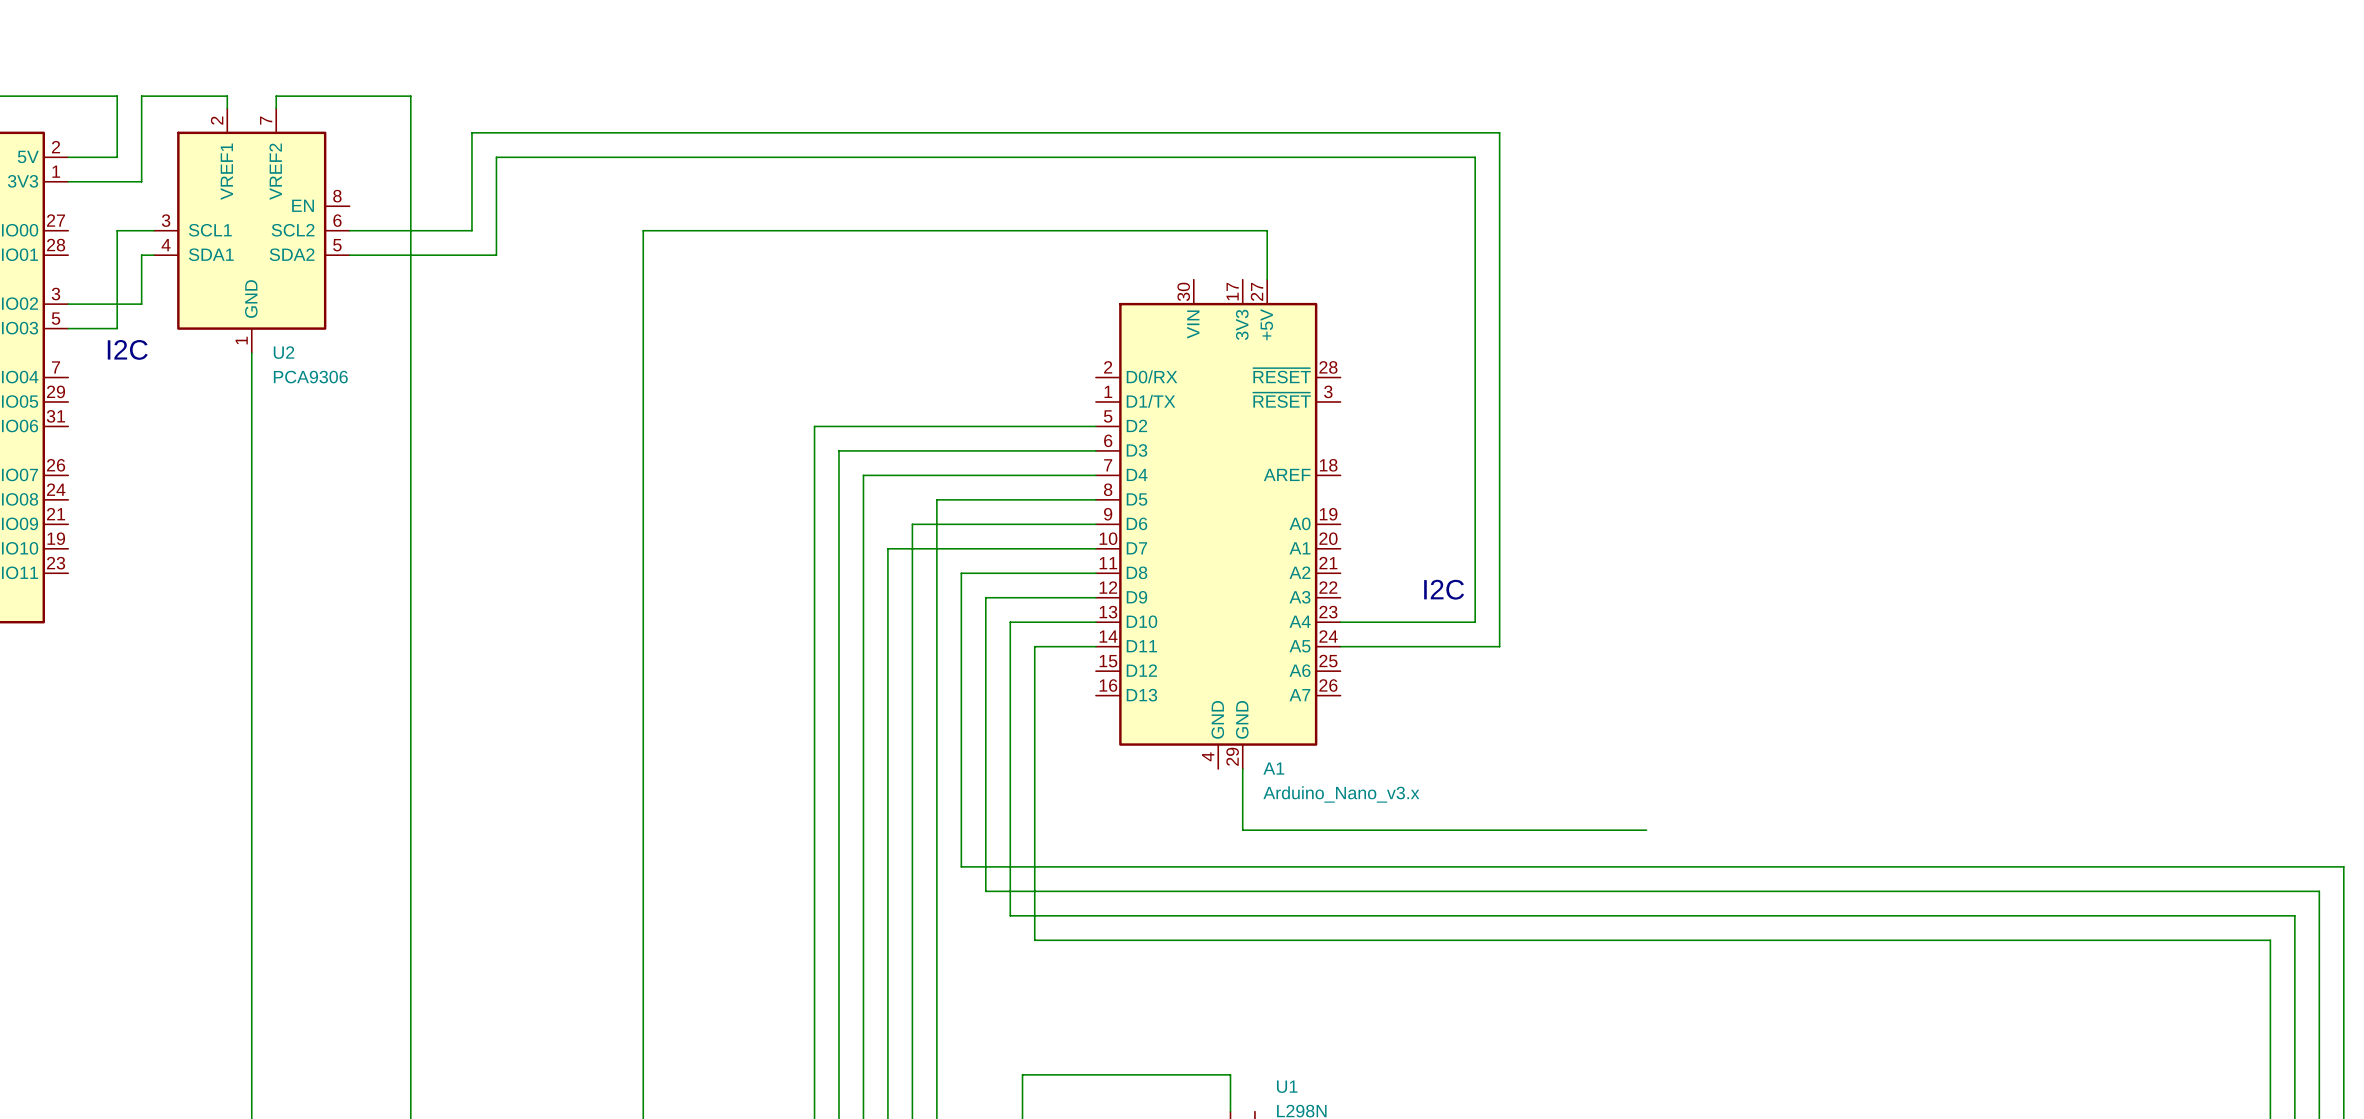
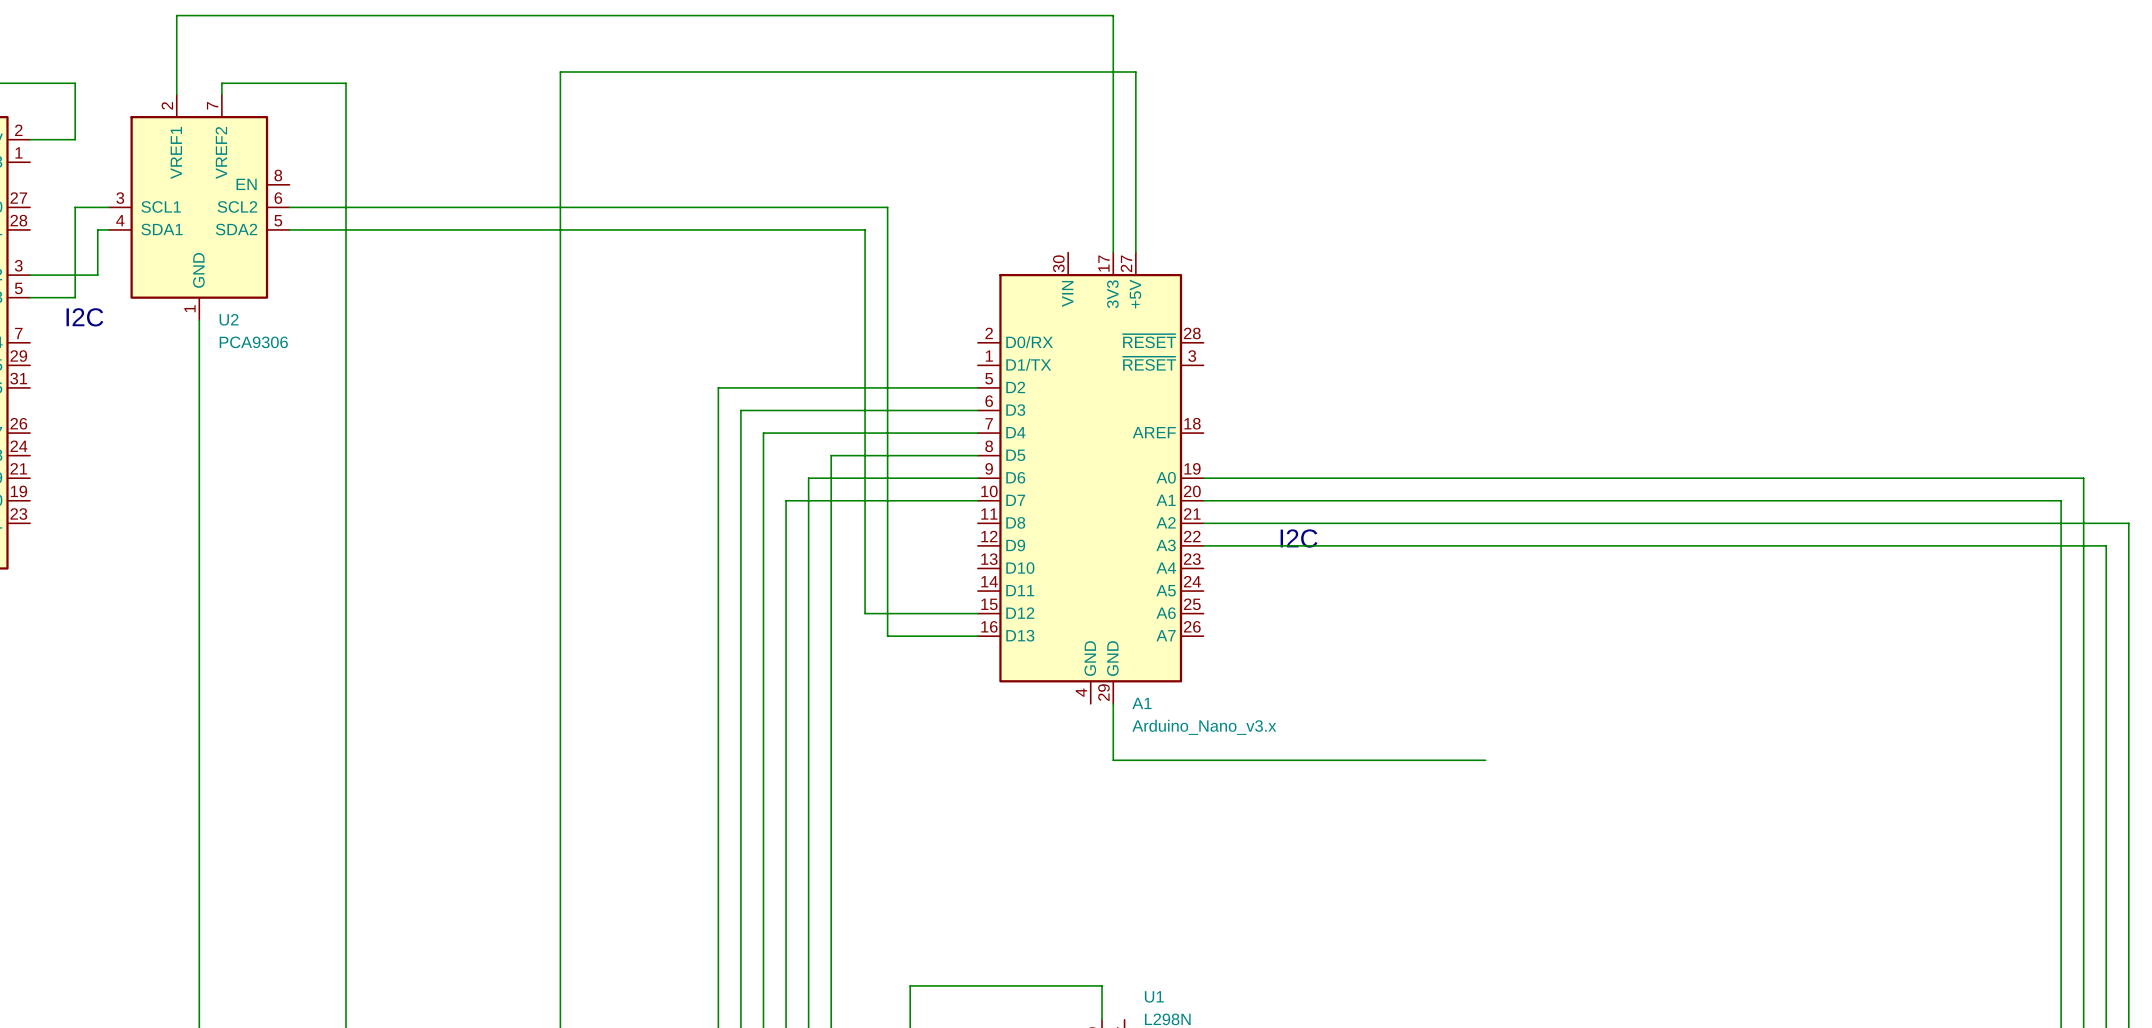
wire: (227, 96) (141, 96) (141, 181) (68, 181) -> (176, 83) (176, 15) (1113, 15) (1113, 252)
wire: (471, 230) (471, 132) (1499, 132) (1499, 646) (1340, 646) -> (402, 207) (560, 207) (560, 71) (1135, 71) (1135, 207)
wire: (998, 230) (1267, 230) -> (887, 207) (887, 636) (977, 636)
wire: (496, 255) (496, 157) (1475, 157) (1475, 622) (1340, 622) -> (424, 229) (865, 229) (865, 613) (977, 613)
wire: (1095, 573) (961, 573) (961, 866) (2343, 866) -> (1203, 523) (2128, 523) (2128, 794)
wire: (1095, 597) (985, 597) (985, 891) (2319, 891) -> (1203, 545) (2106, 545) (2106, 816)
wire: (1095, 622) (1010, 622) (1010, 915) (2294, 915) -> (1203, 478) (2083, 478) (2083, 839)
wire: (1095, 646) (1034, 646) (1034, 940) (2270, 940) -> (1203, 500) (2061, 500) (2061, 861)

